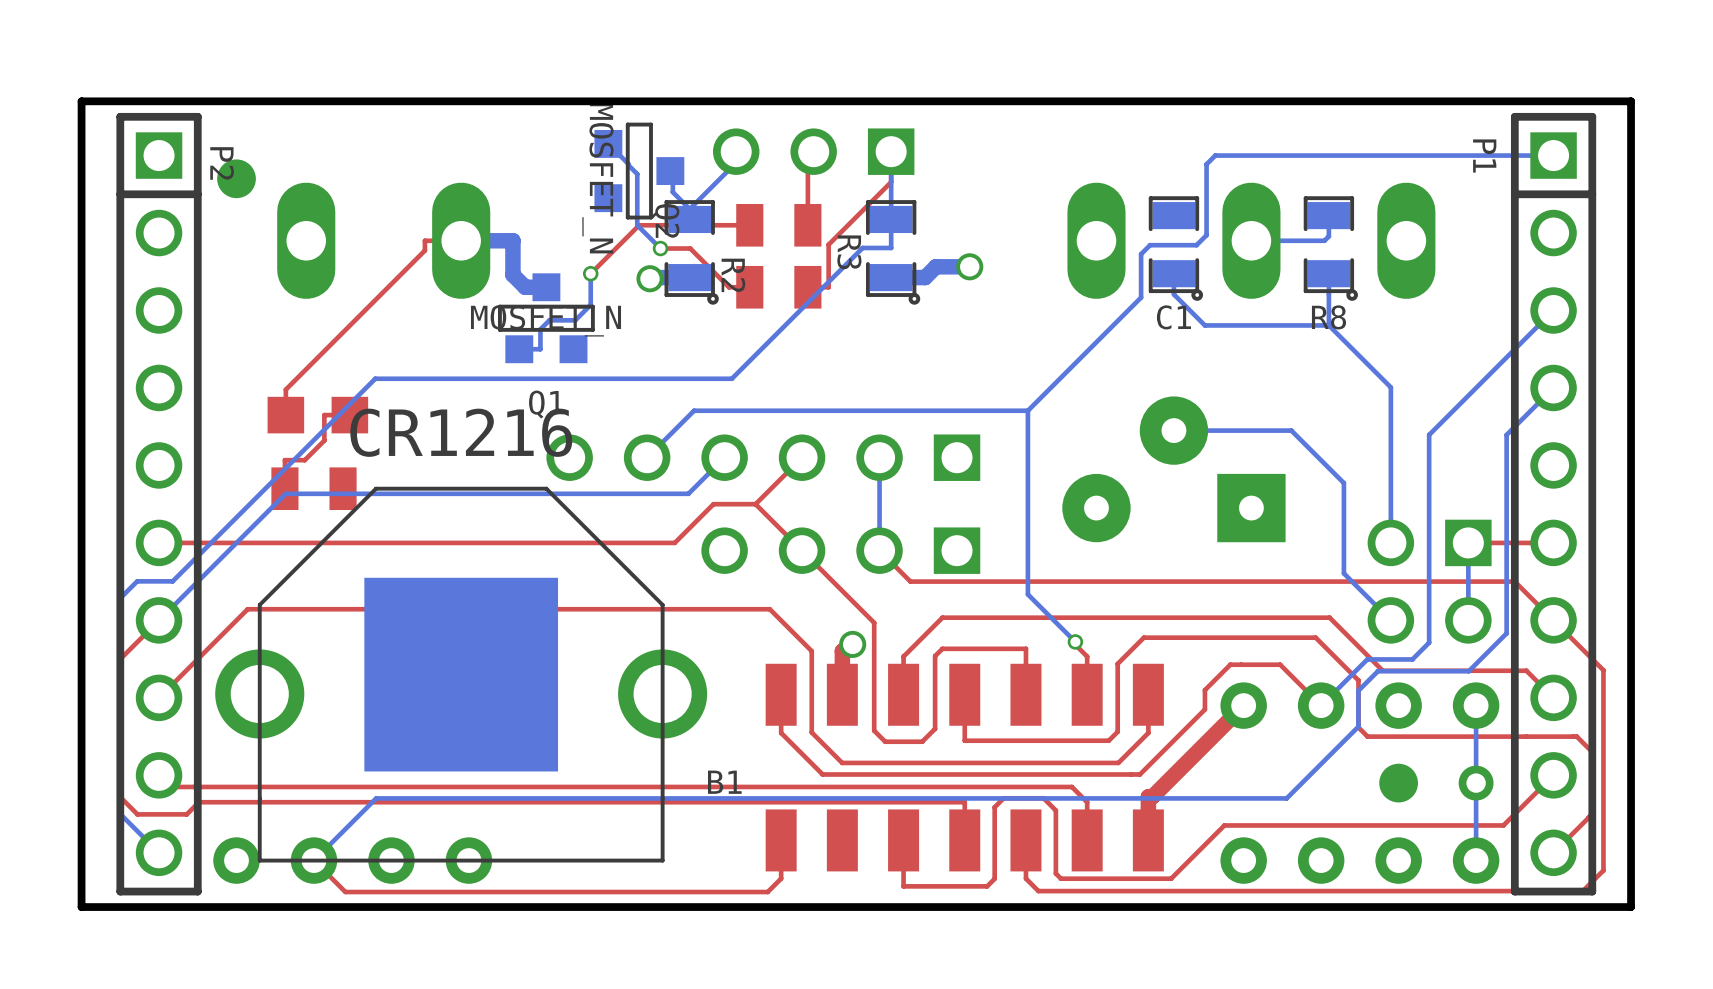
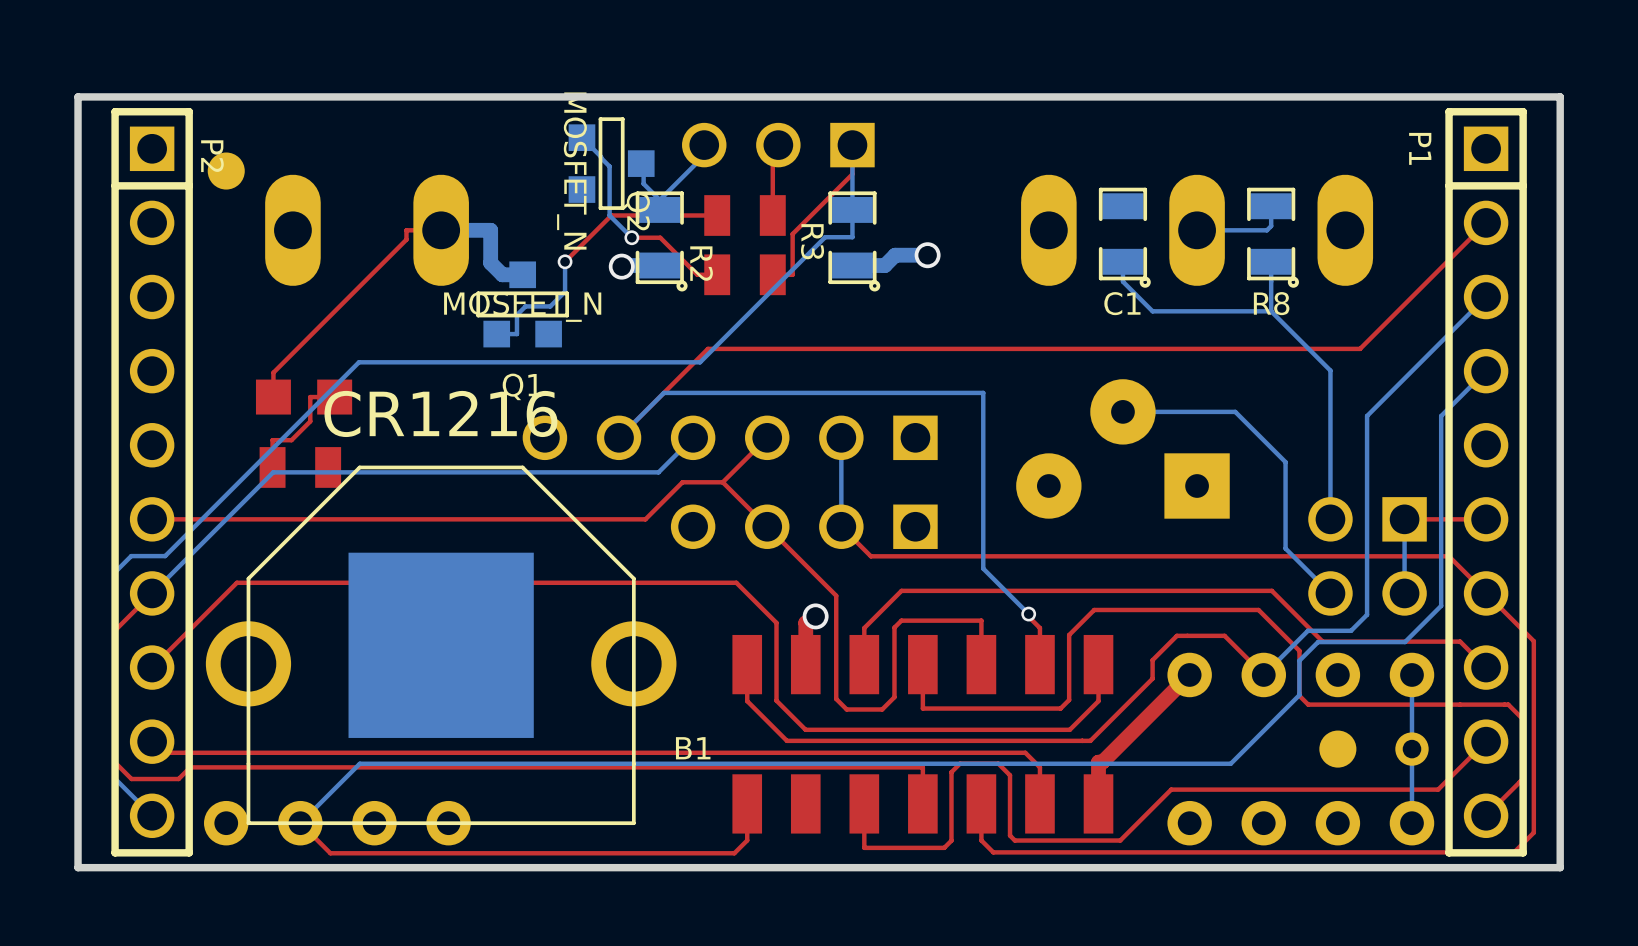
bottom track: (1553, 155) (1215, 155) (1206, 164) (1206, 235) (1196, 245) (1150, 245) (1141, 254) (1141, 297) (1027, 410) -> none
top track: none -> (1486, 222) (1360, 348) (707, 348) (619, 437)

